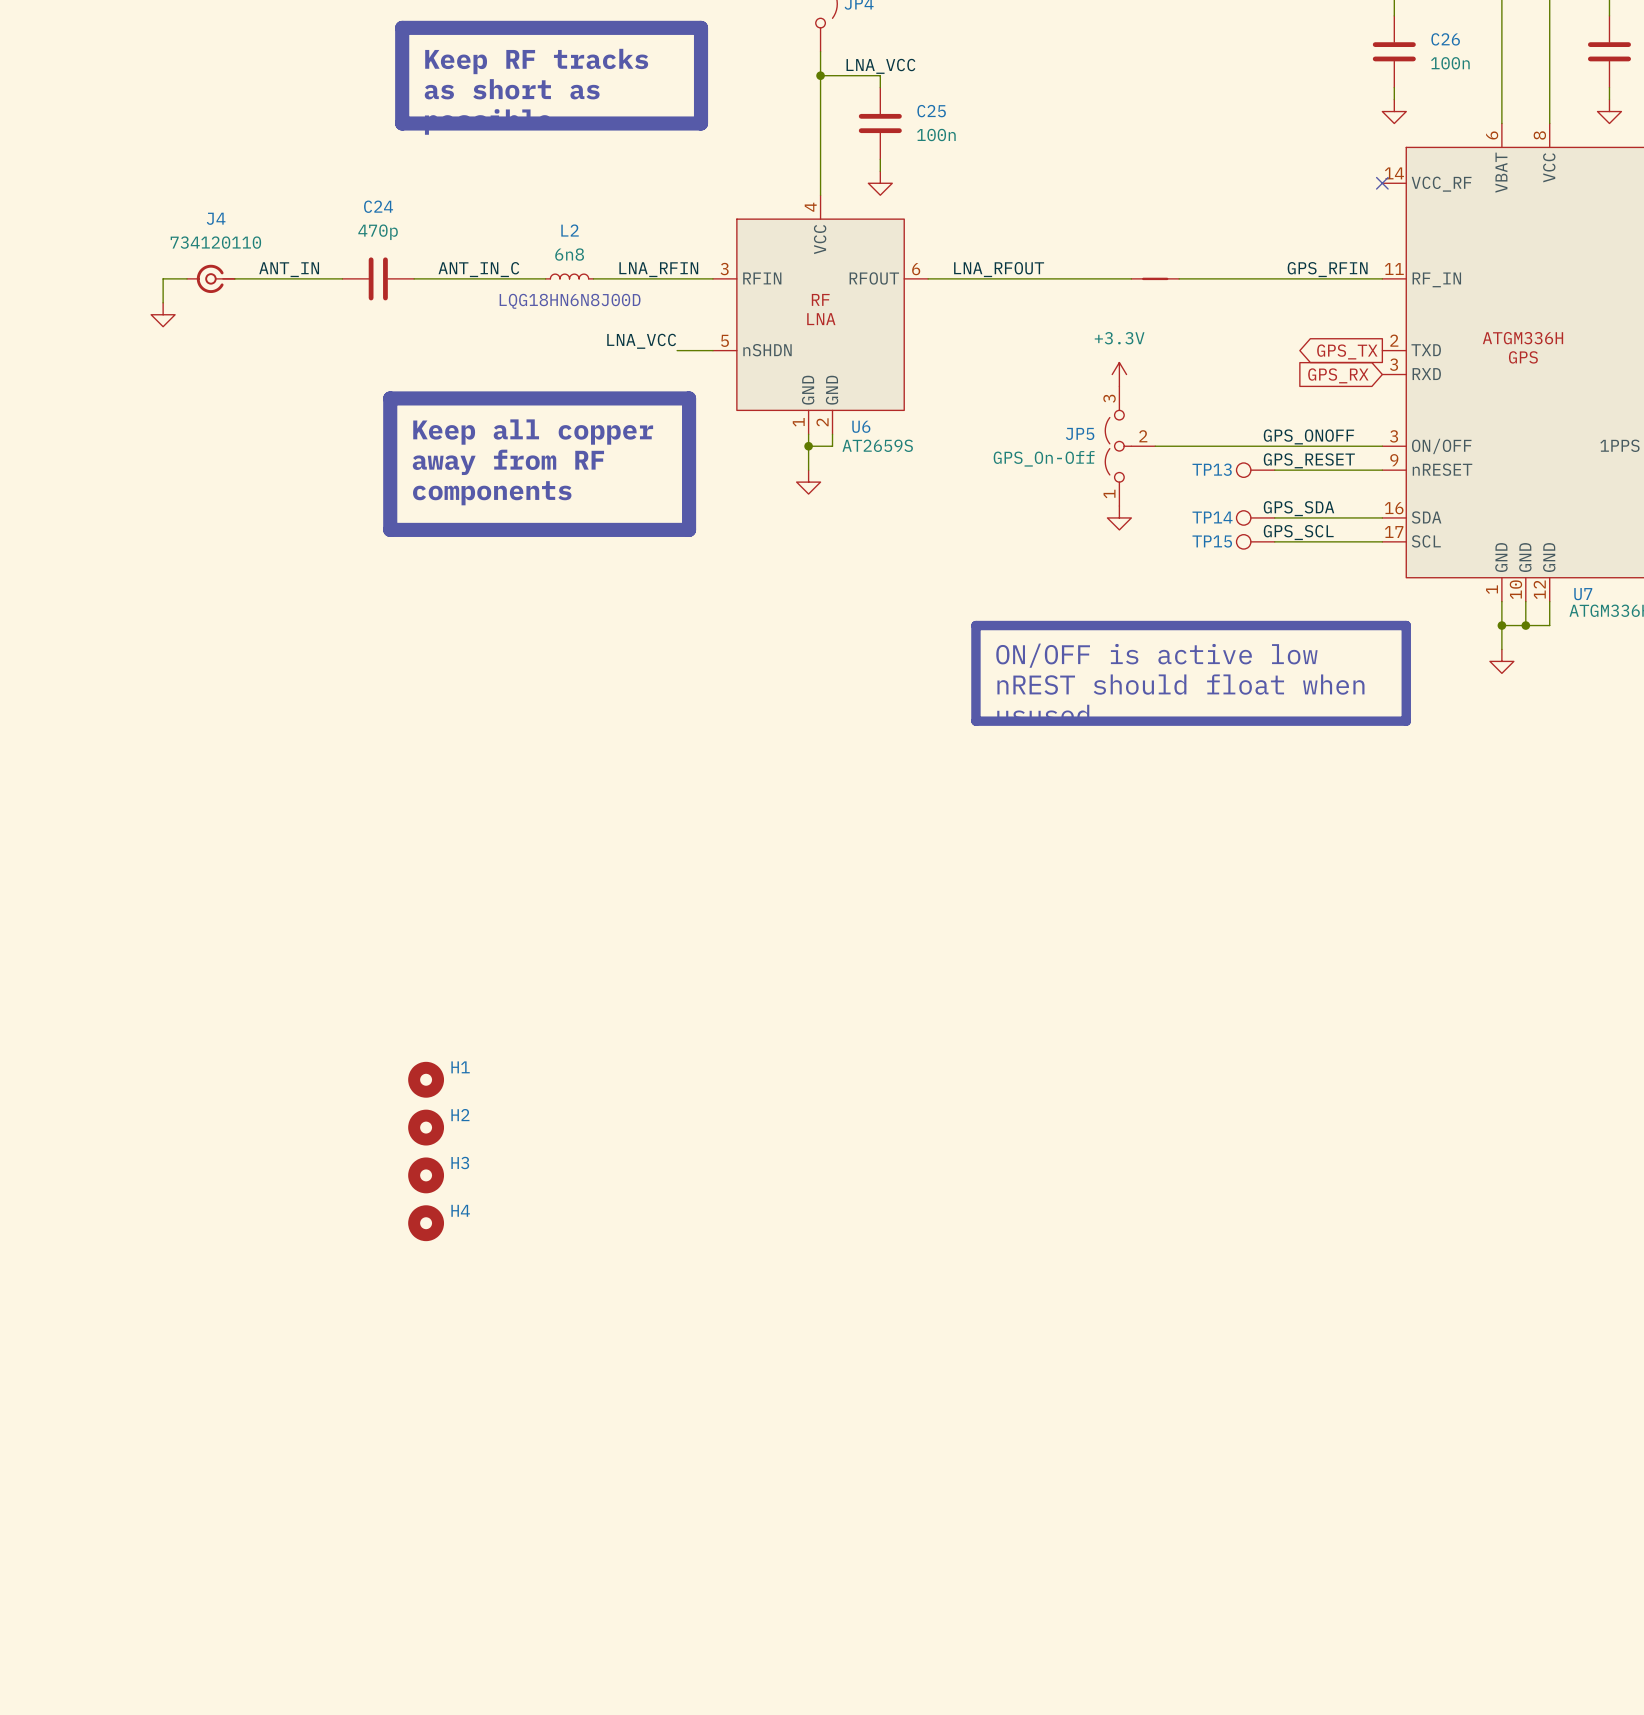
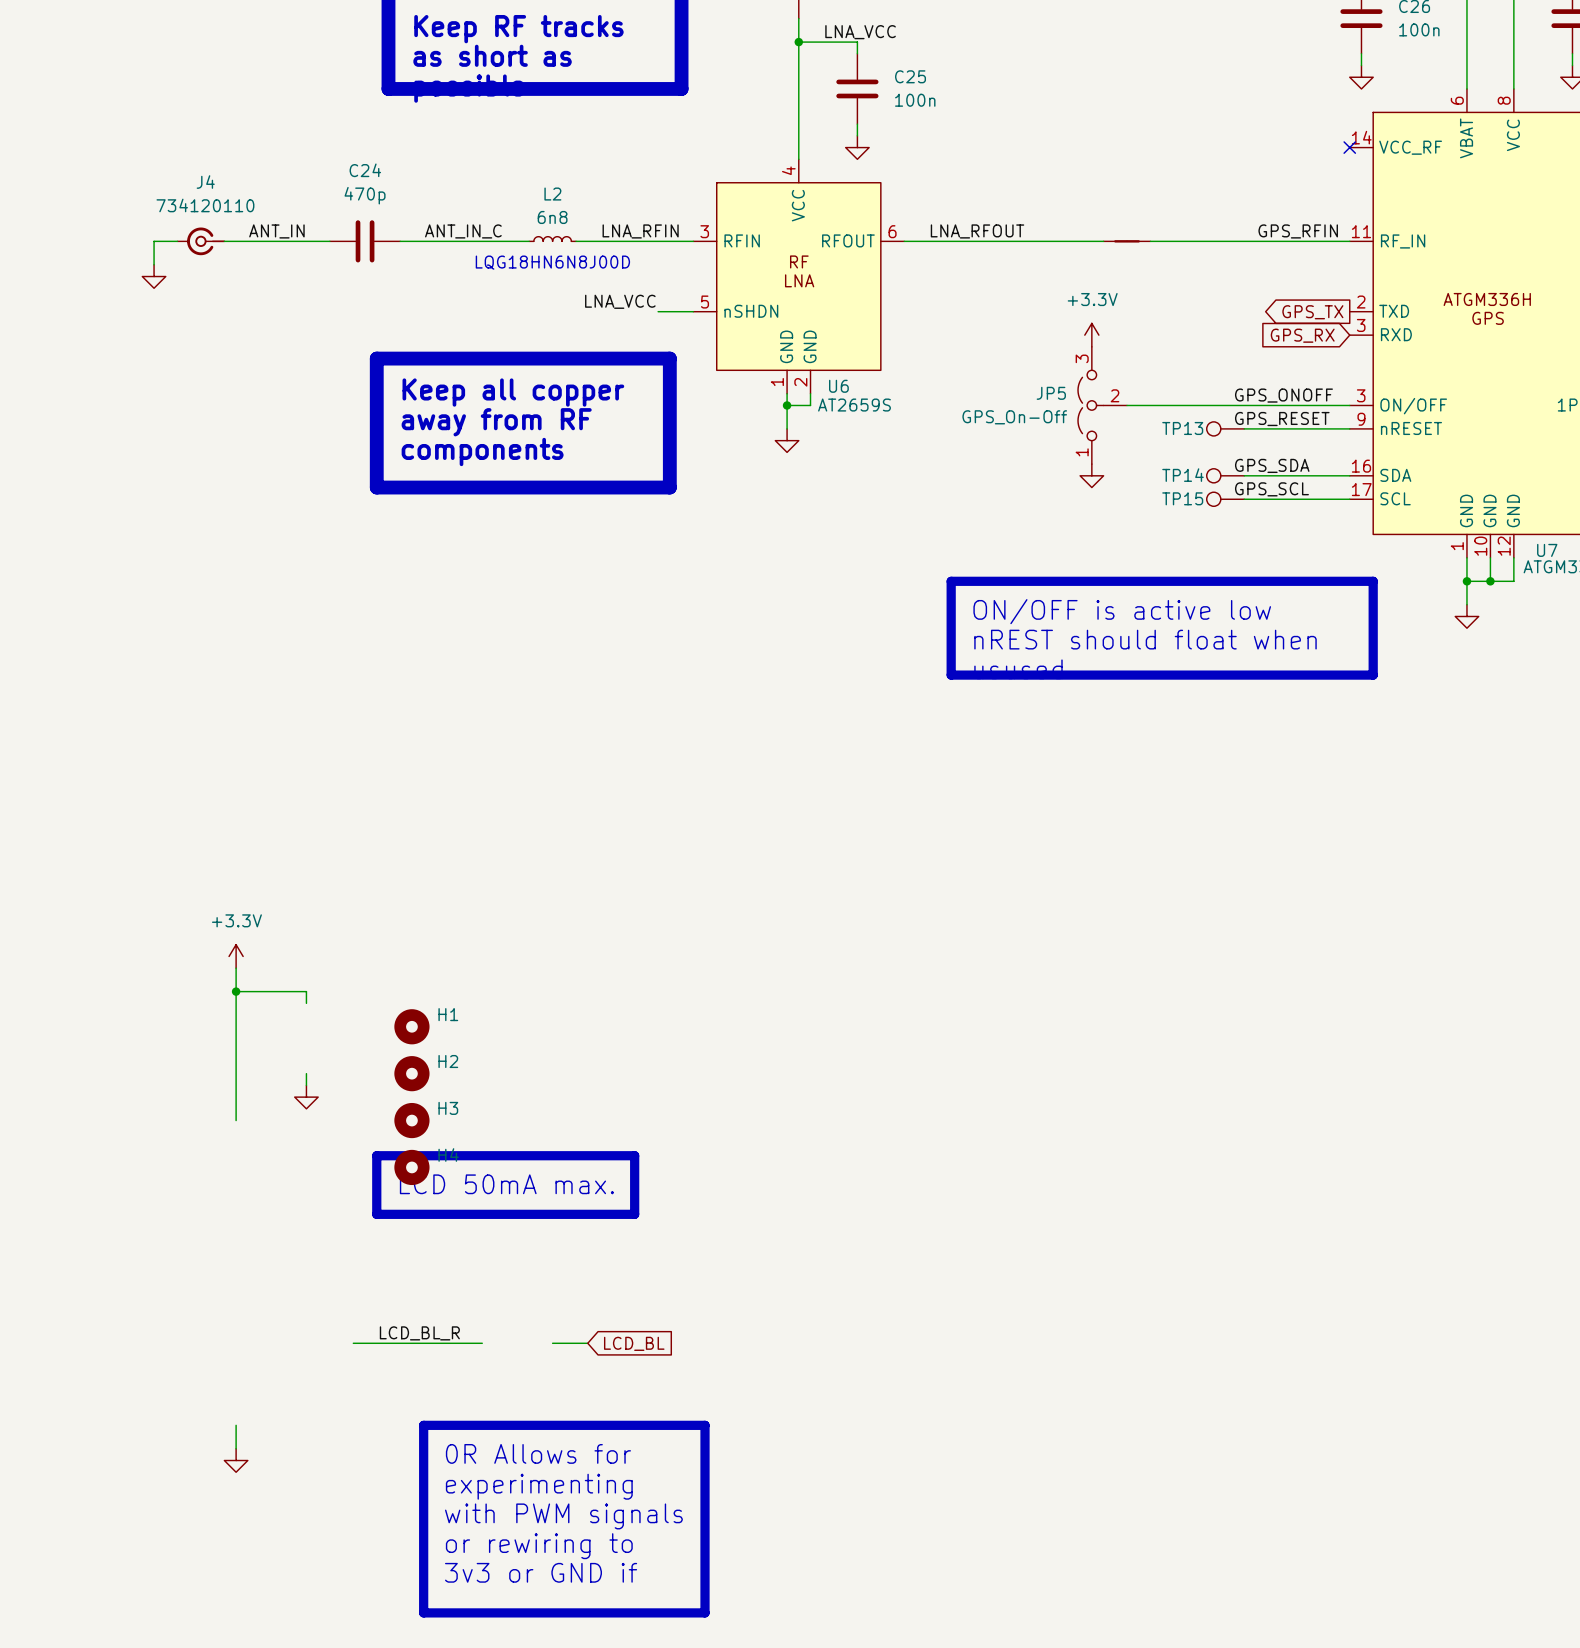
power symbol: none -> +3.3V (236, 956)
wire: none -> (236, 968) (236, 1120)
wire: none -> (236, 991) (306, 991) (306, 1003)
junction: none -> (236, 991)
wire: none -> (306, 1073) (306, 1085)
power symbol: none -> (306, 1097)
line: none -> (376, 1155) (634, 1155) (634, 1214) (376, 1214) (376, 1155)
text: none -> LCD 50mA max. (506, 1184)
label: none -> LCD_BL_R (419, 1333)
wire: none -> (353, 1343) (482, 1343)
wire: none -> (552, 1343) (587, 1343)
global label: none -> LCD_BL (634, 1343)
wire: none -> (236, 1425) (236, 1448)
line: none -> (423, 1425) (705, 1425) (705, 1612) (423, 1612) (423, 1425)
text: none -> 0R Allows for (538, 1453)
power symbol: none -> (236, 1460)
text: none -> experimenting (539, 1486)
text: none -> with PWM signals (563, 1516)
text: none -> or rewiring to (539, 1546)
text: none -> 3v3 or GND if (541, 1572)

